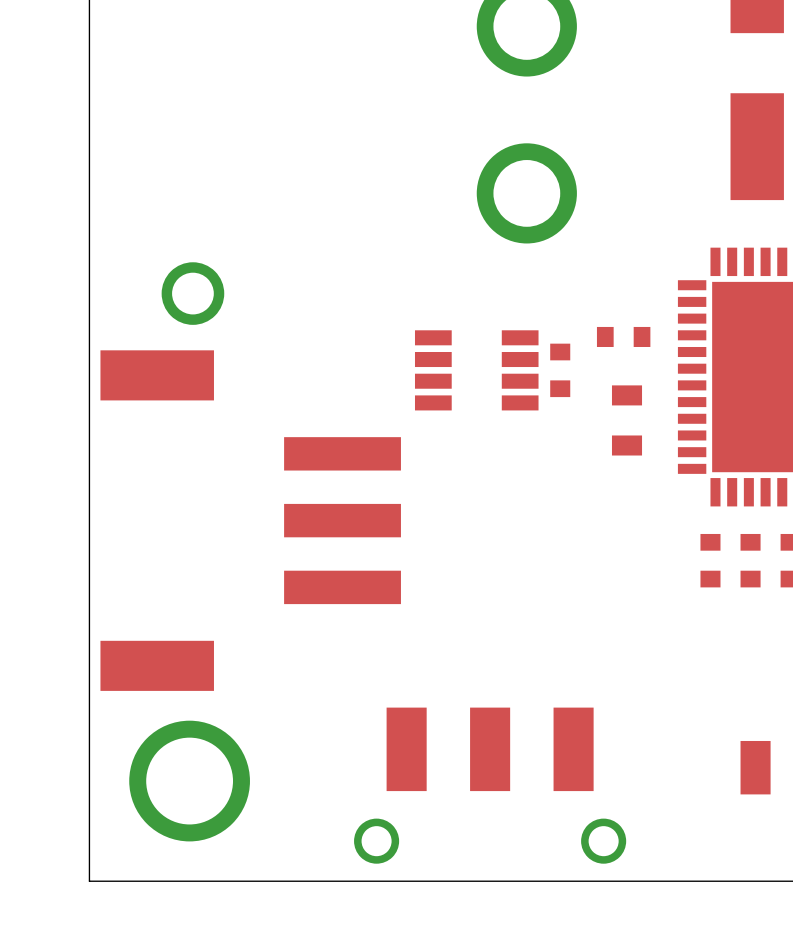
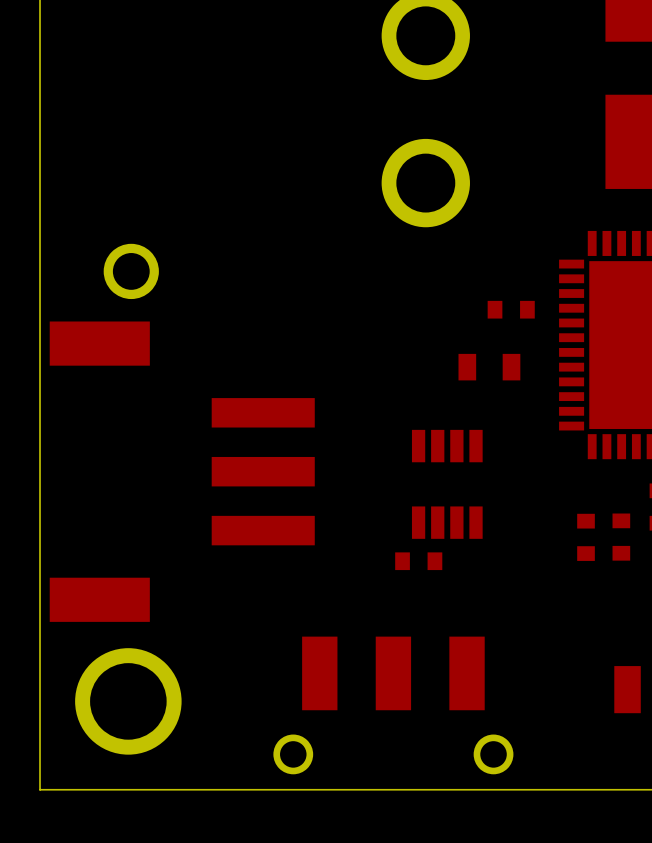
part rotation: 0° (476, 370) -> 90° clockwise (447, 484)
part position: (476, 370) -> (447, 484)
part: (560, 370) -> none
part rotation: 0° (627, 420) -> 90° clockwise (489, 367)
part: (710, 560) -> none
part: (750, 560) -> none
part: none -> (621, 537)
part: none -> (586, 537)
part: none -> (418, 561)

